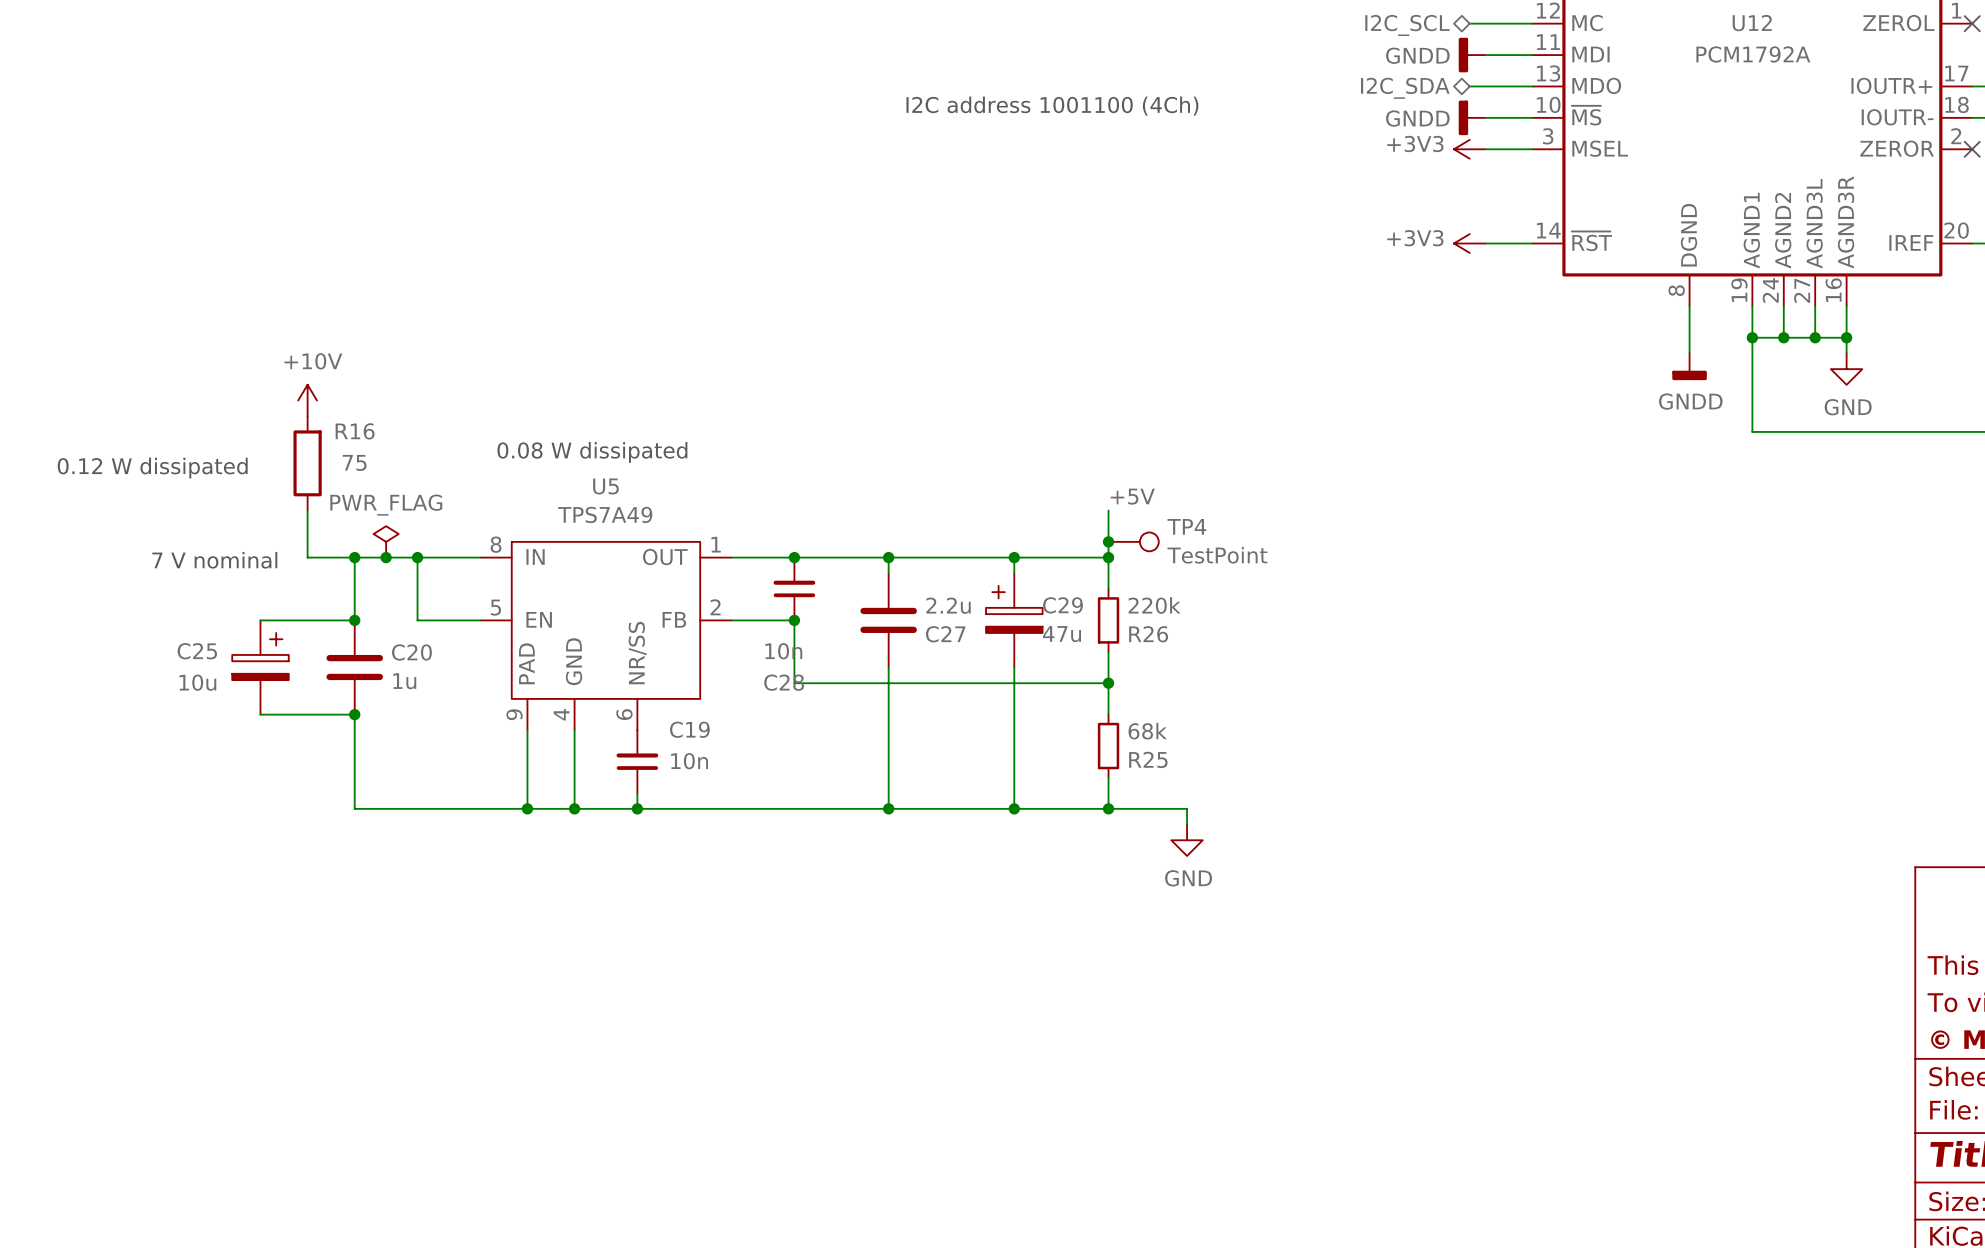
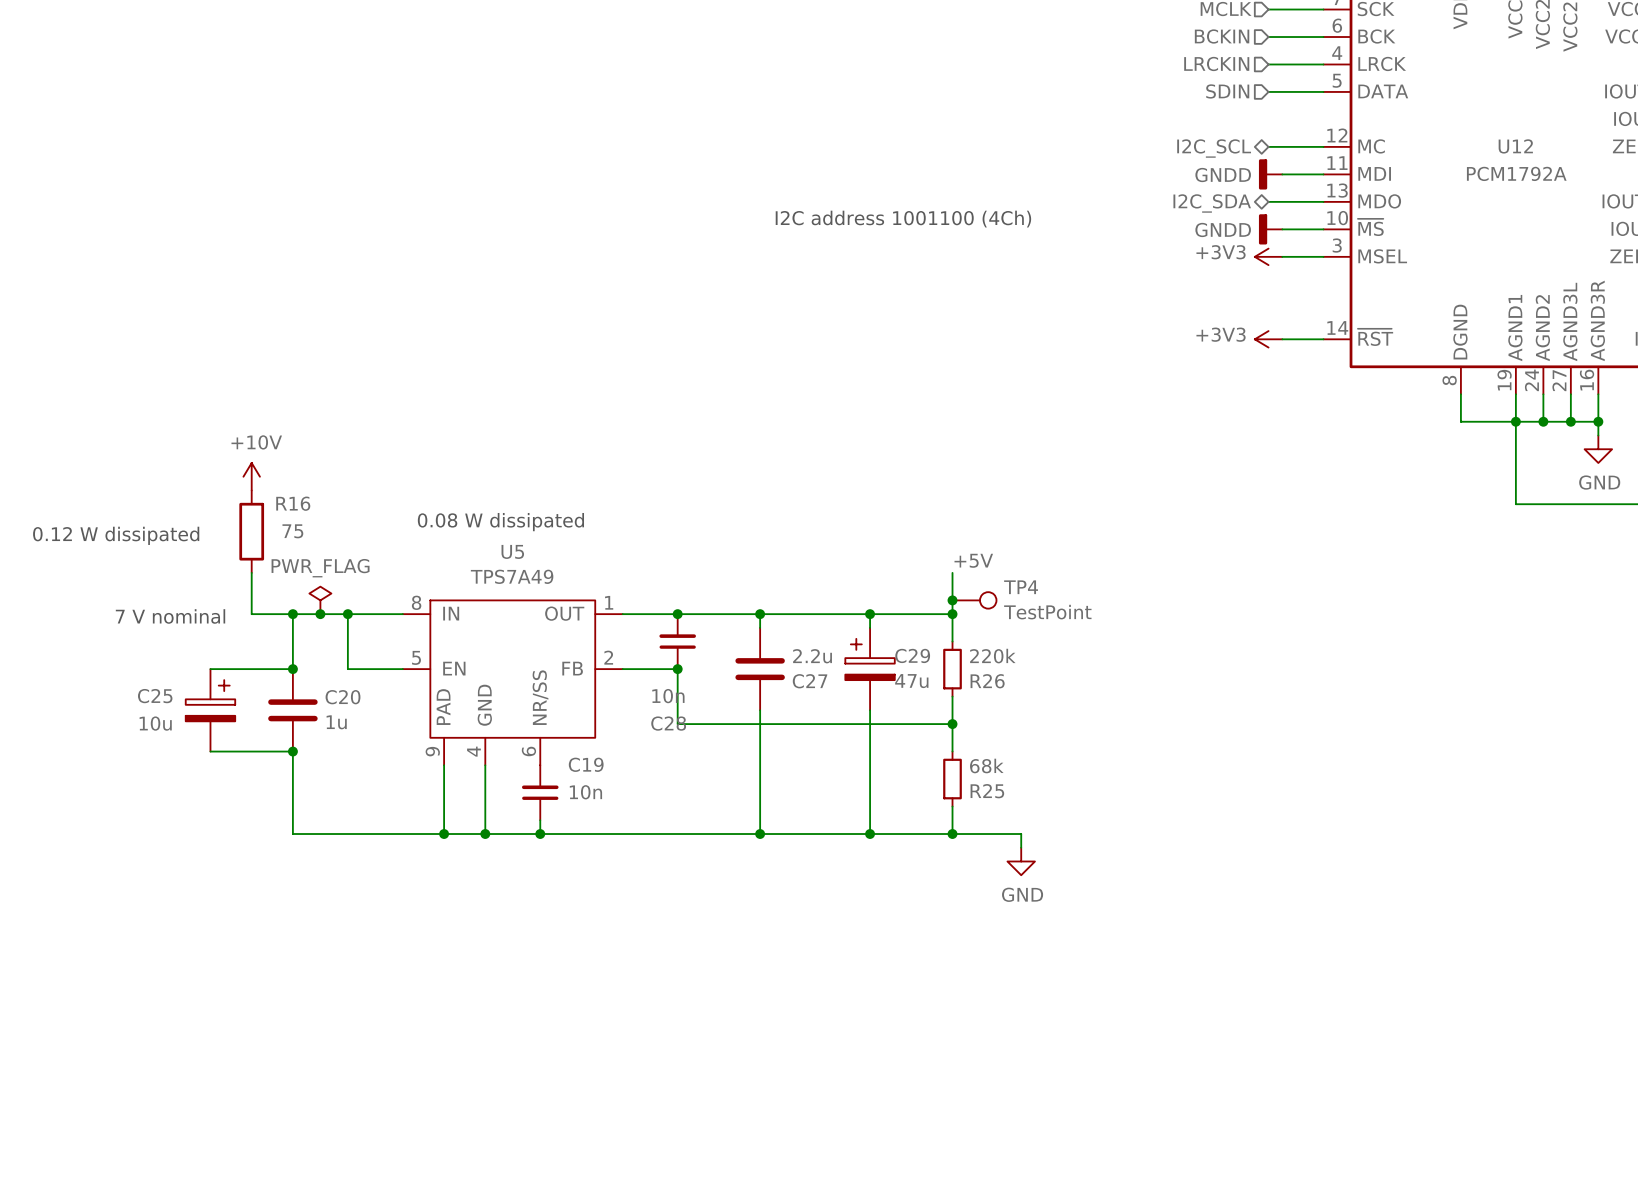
wire: (1689, 337) (1689, 353) -> (1460, 421) (1515, 421)
power symbol: GNDD (1689, 366) -> none

